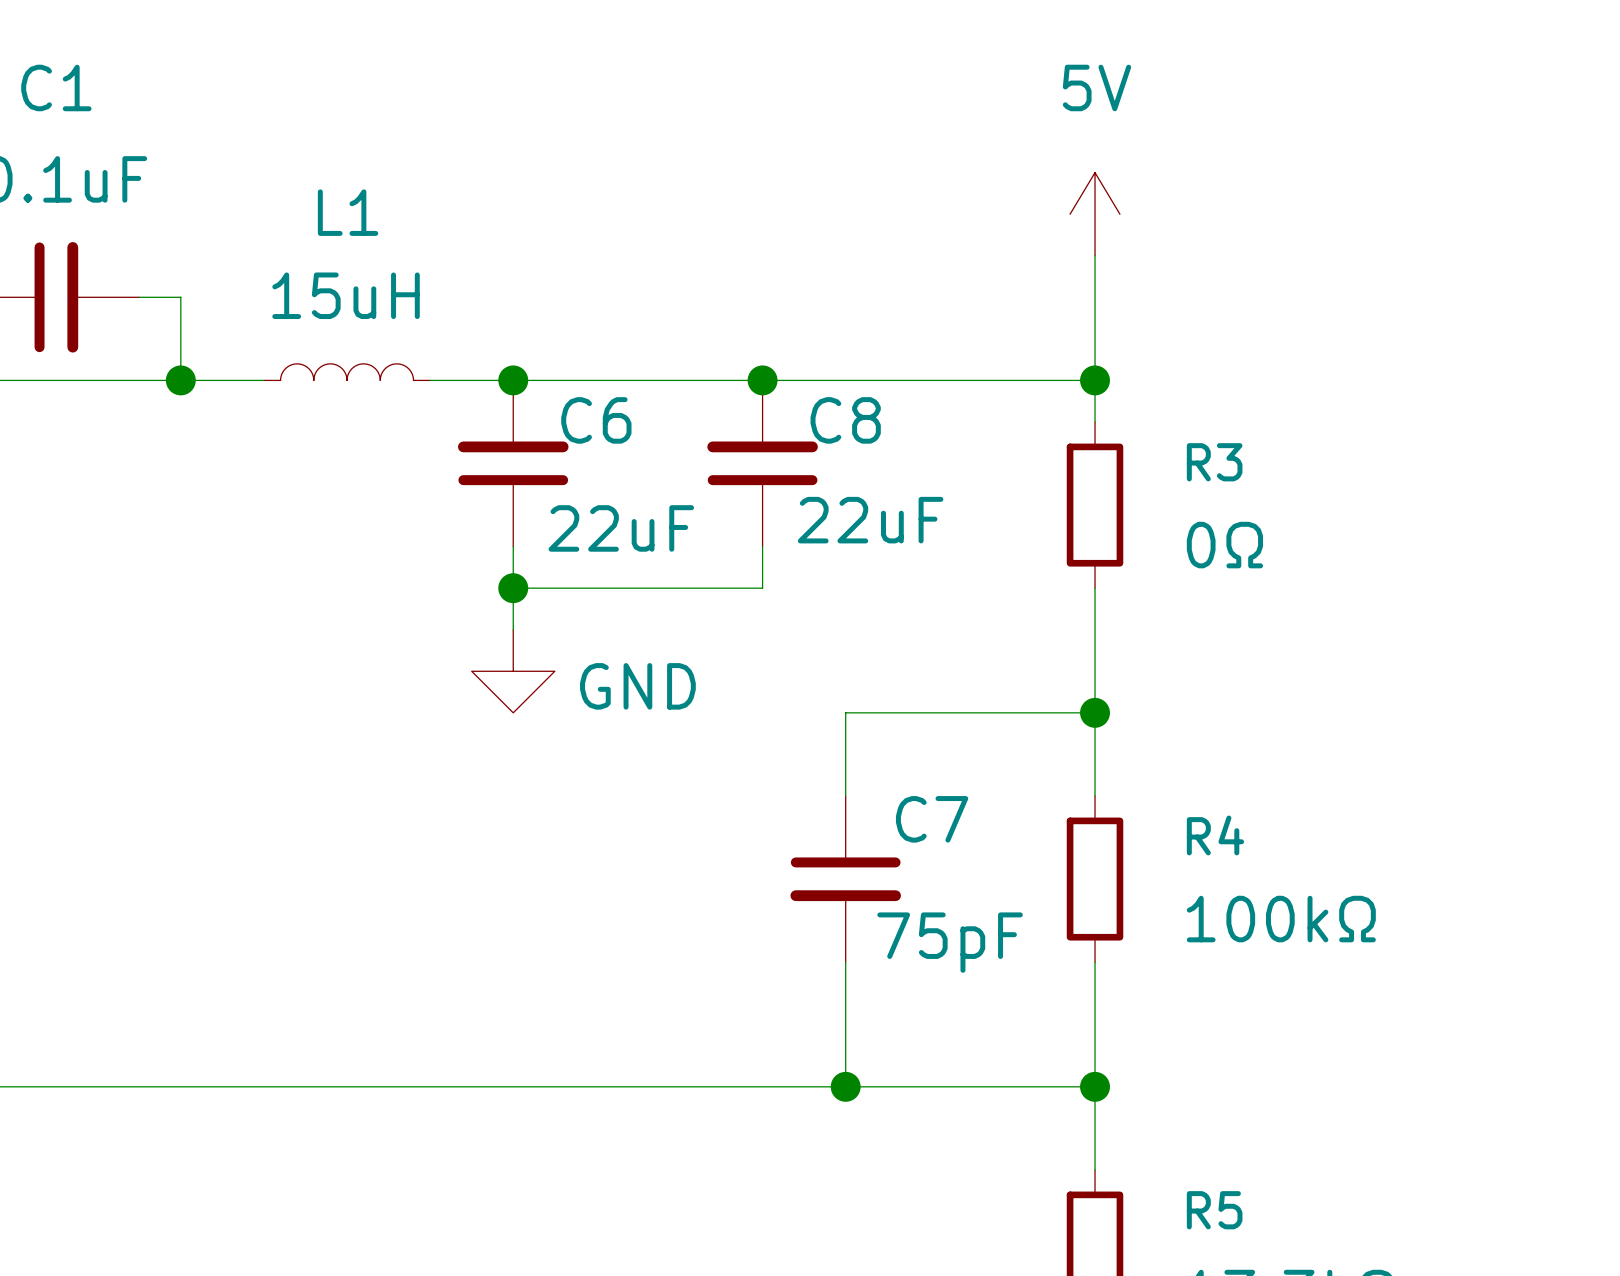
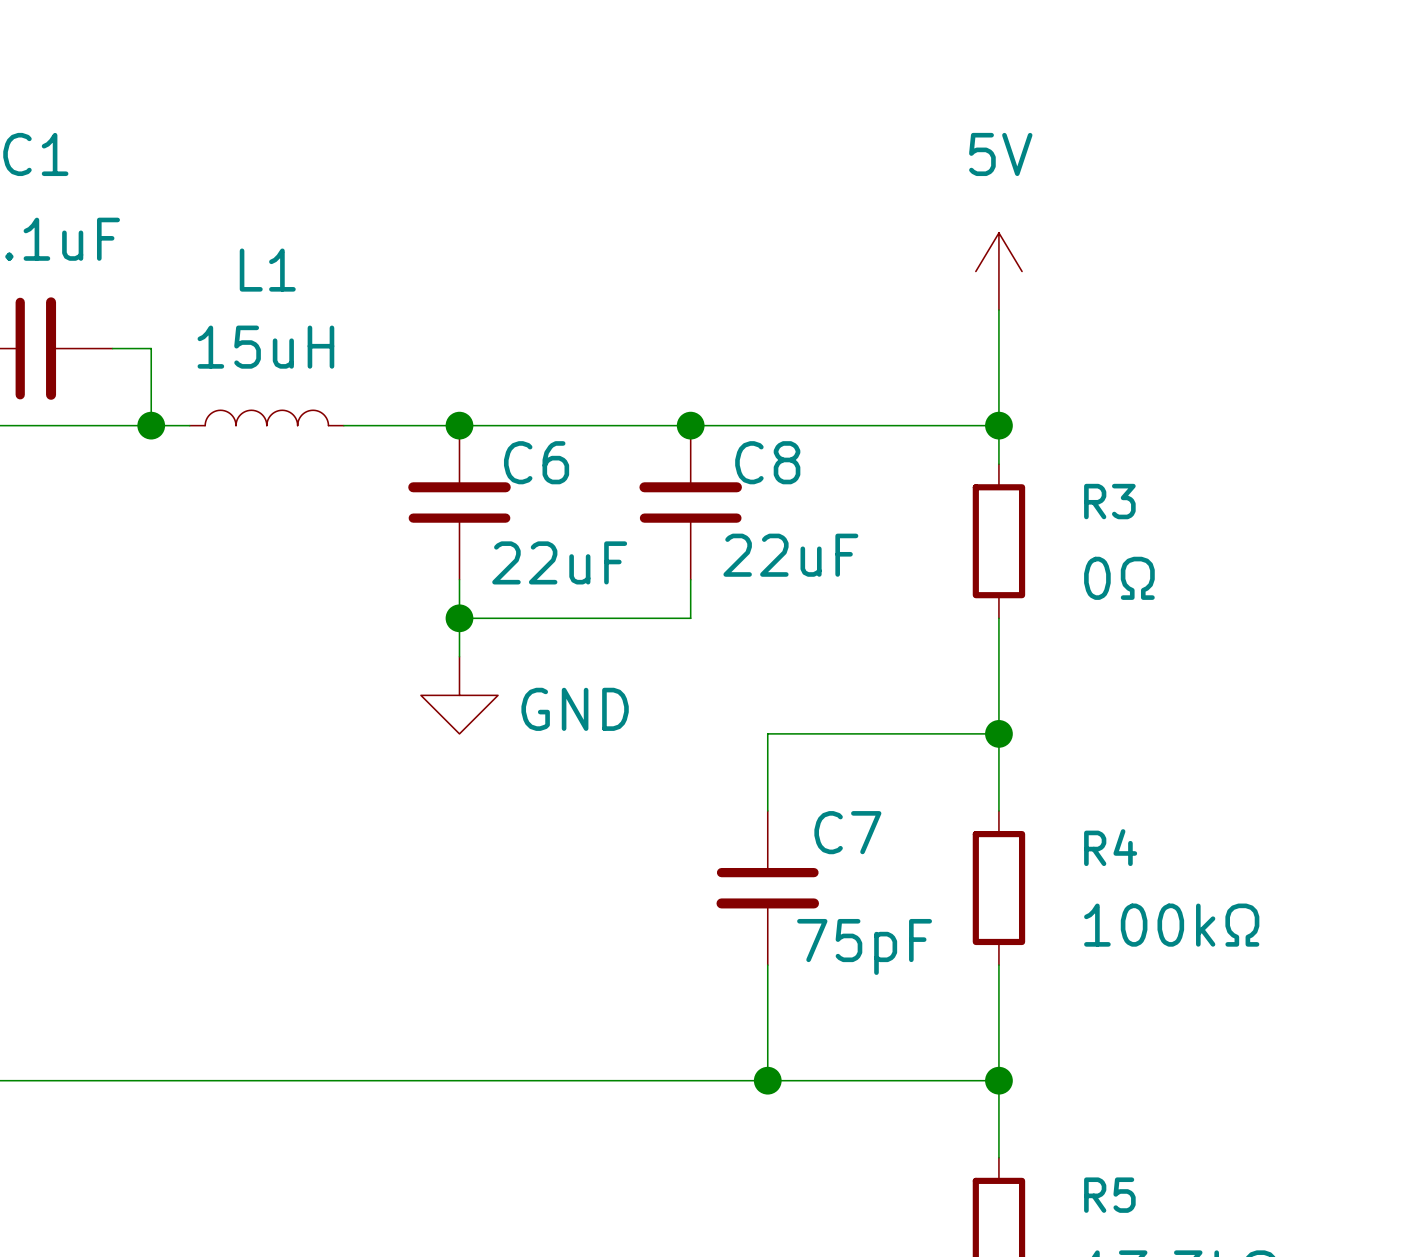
L1 position: (347, 372) -> (266, 417)
wire: (222, 380) (263, 380) -> (343, 425) (382, 425)

